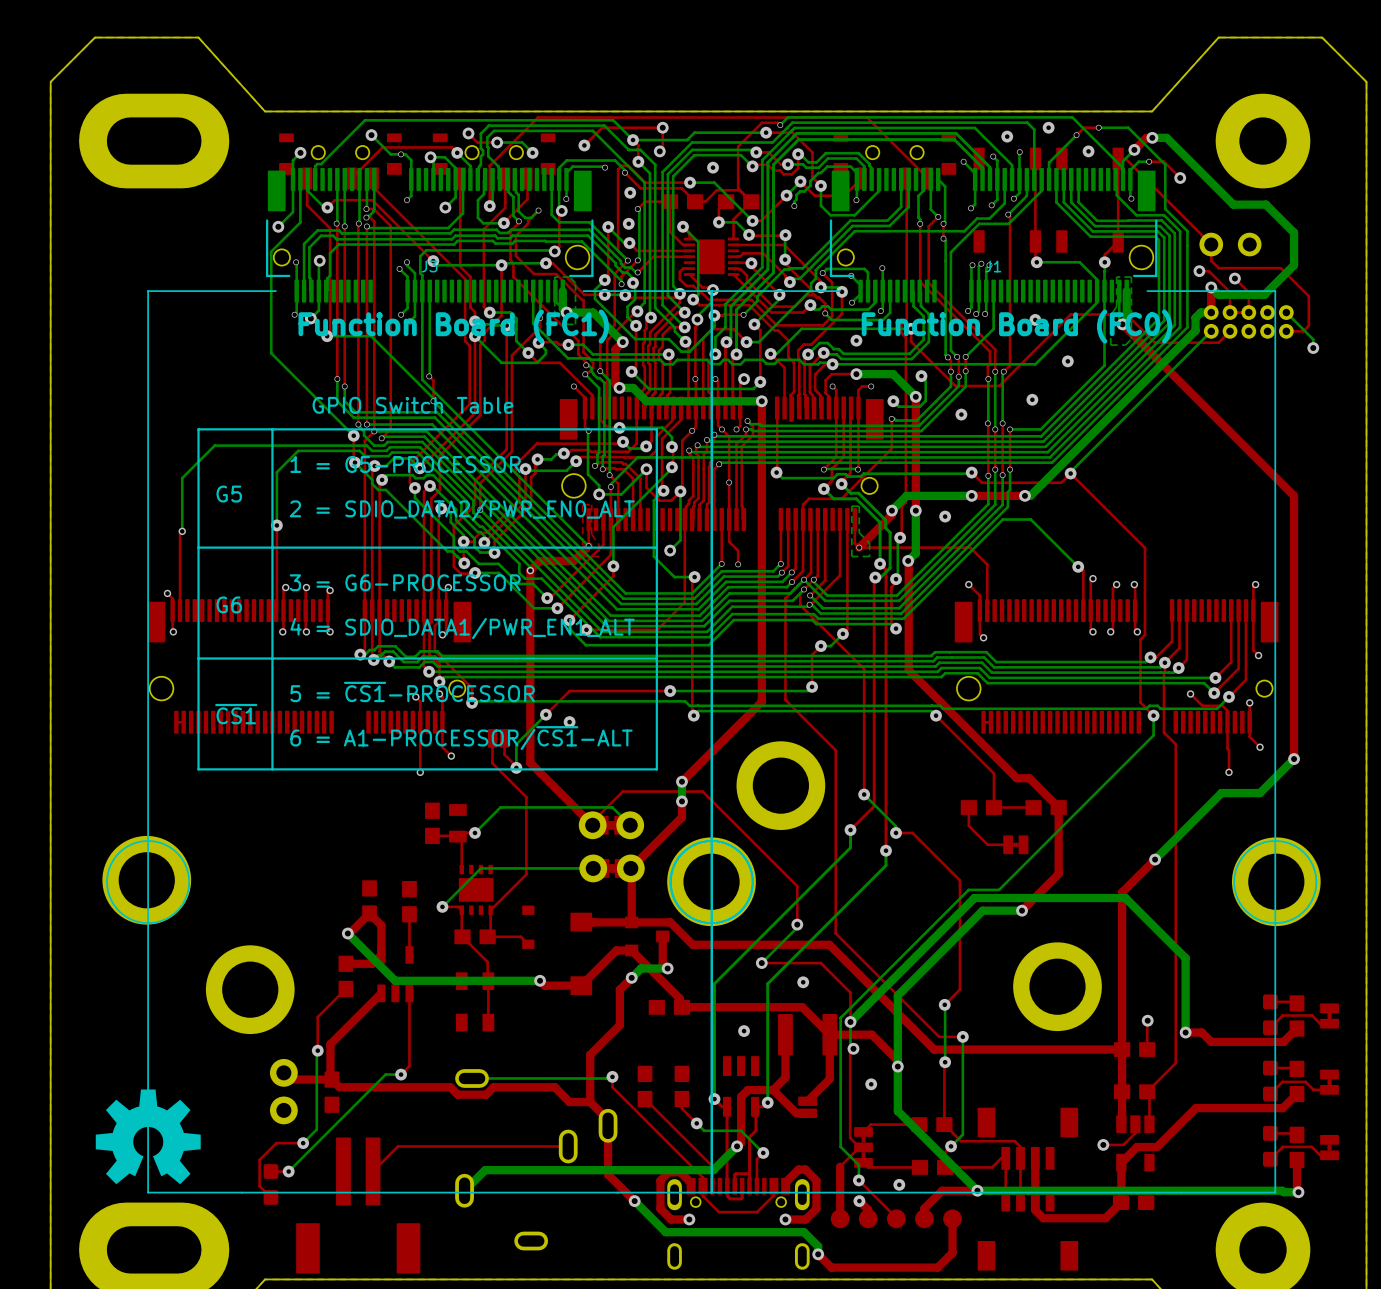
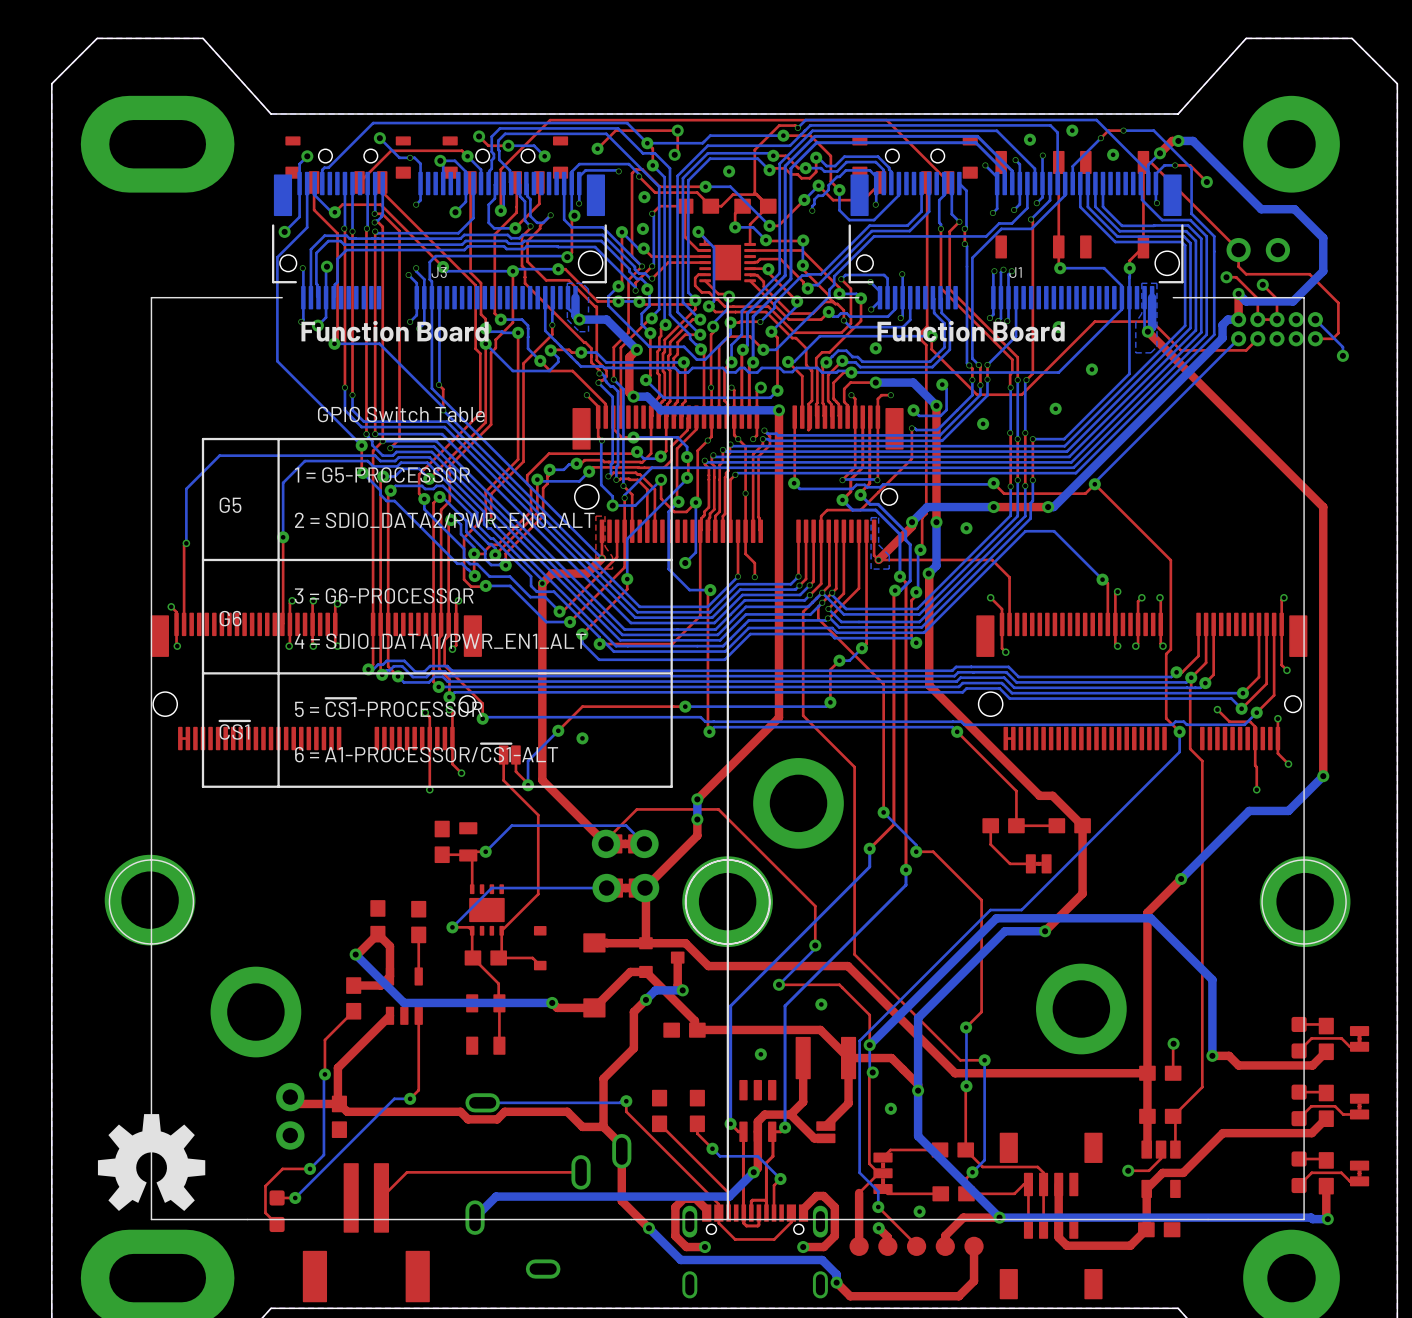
text: Function Board (FC1) (453, 326) -> Function Board (395, 331)
text: Function Board (FC0) (1017, 326) -> Function Board (971, 331)

